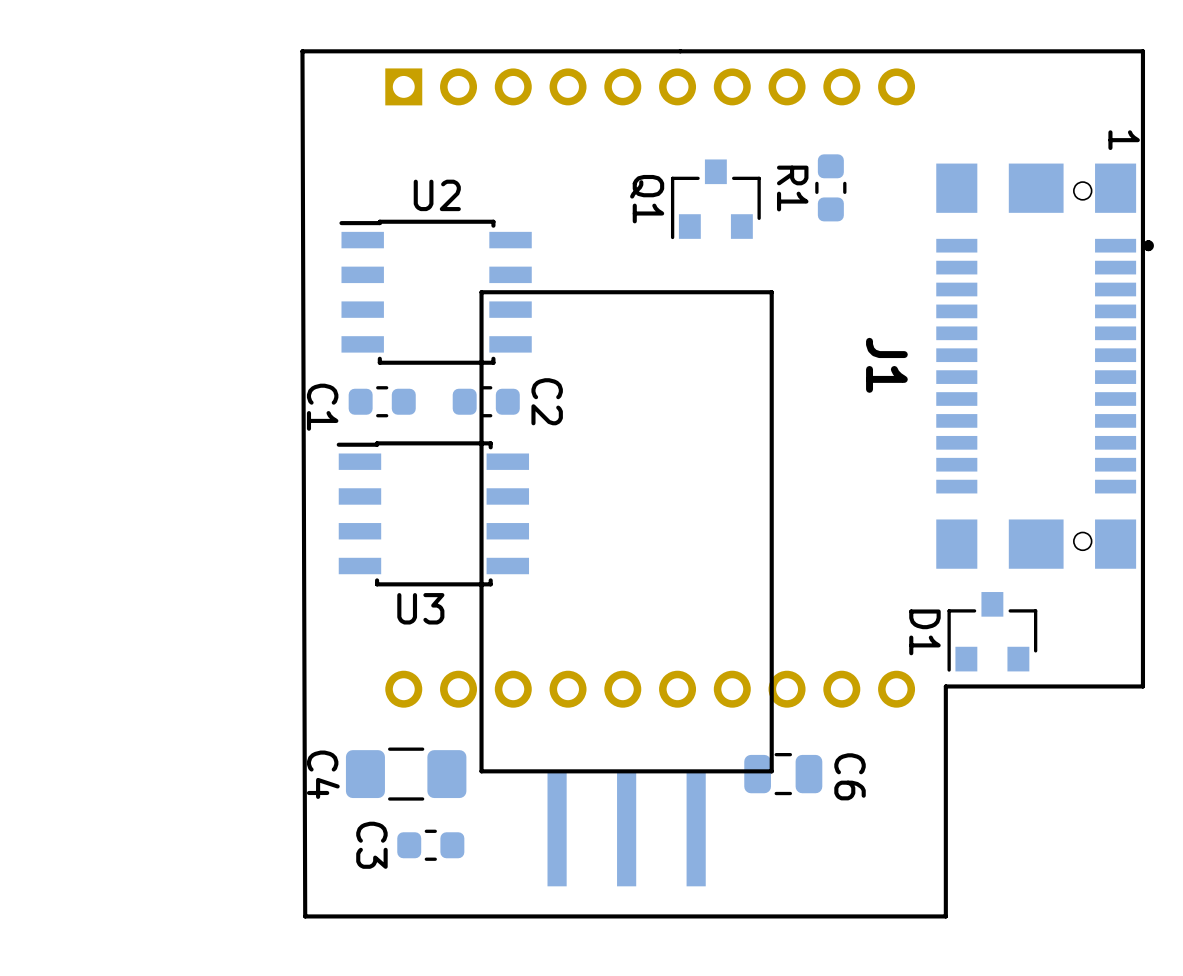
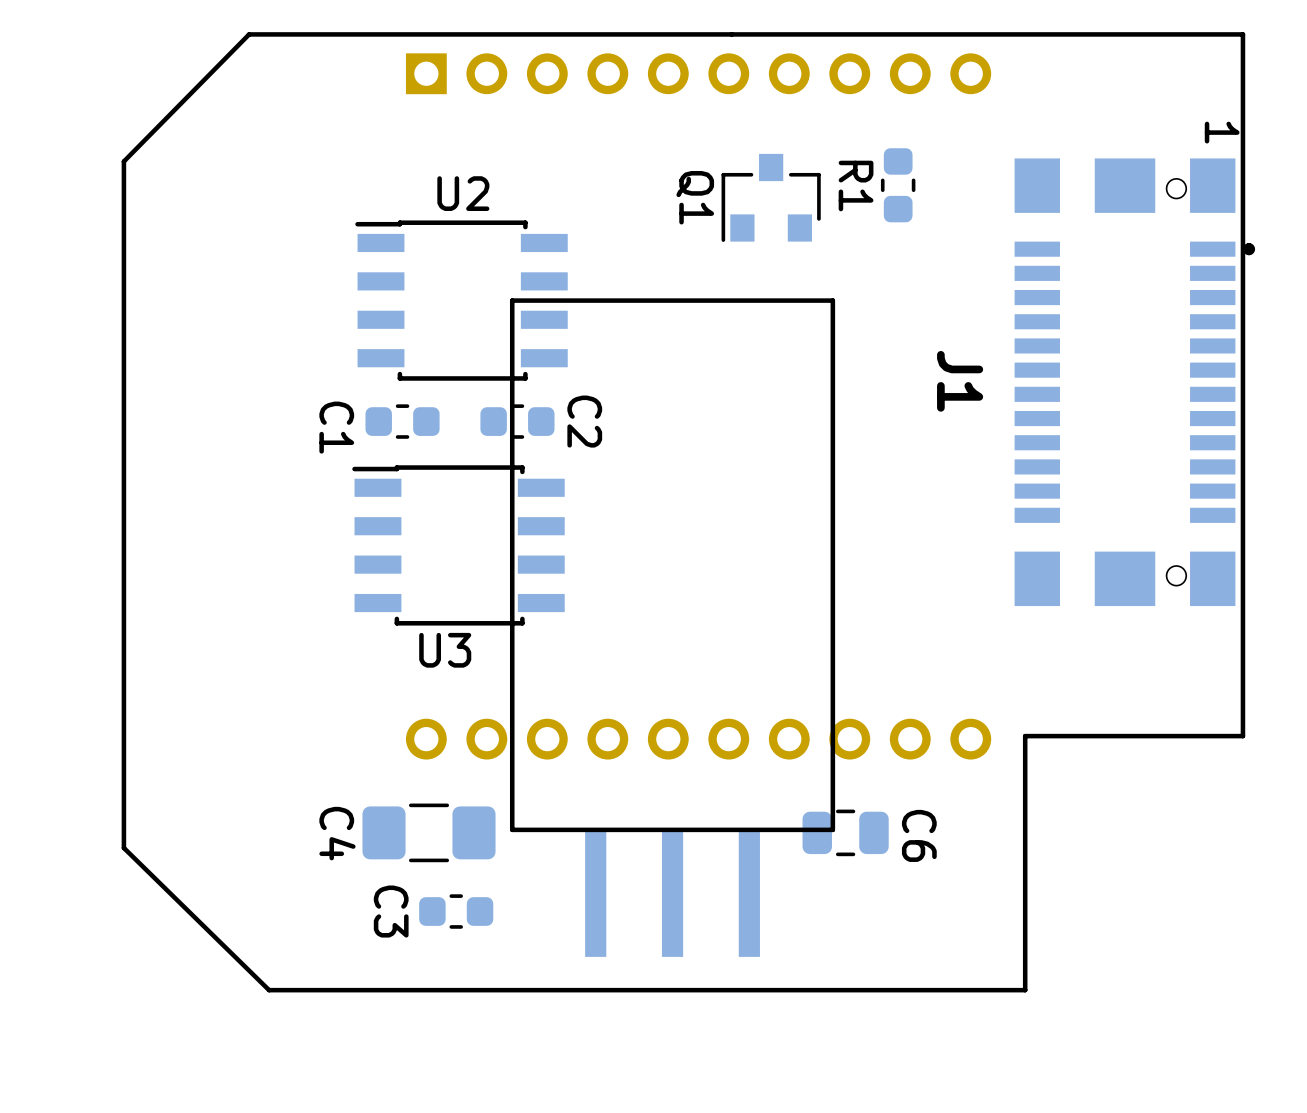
board edge: (302, 51) (305, 916) -> (248, 34) (123, 161) (123, 848) (269, 990) (317, 990)
board edge: none -> (314, 34) (248, 34)
D1: (992, 631) -> none

